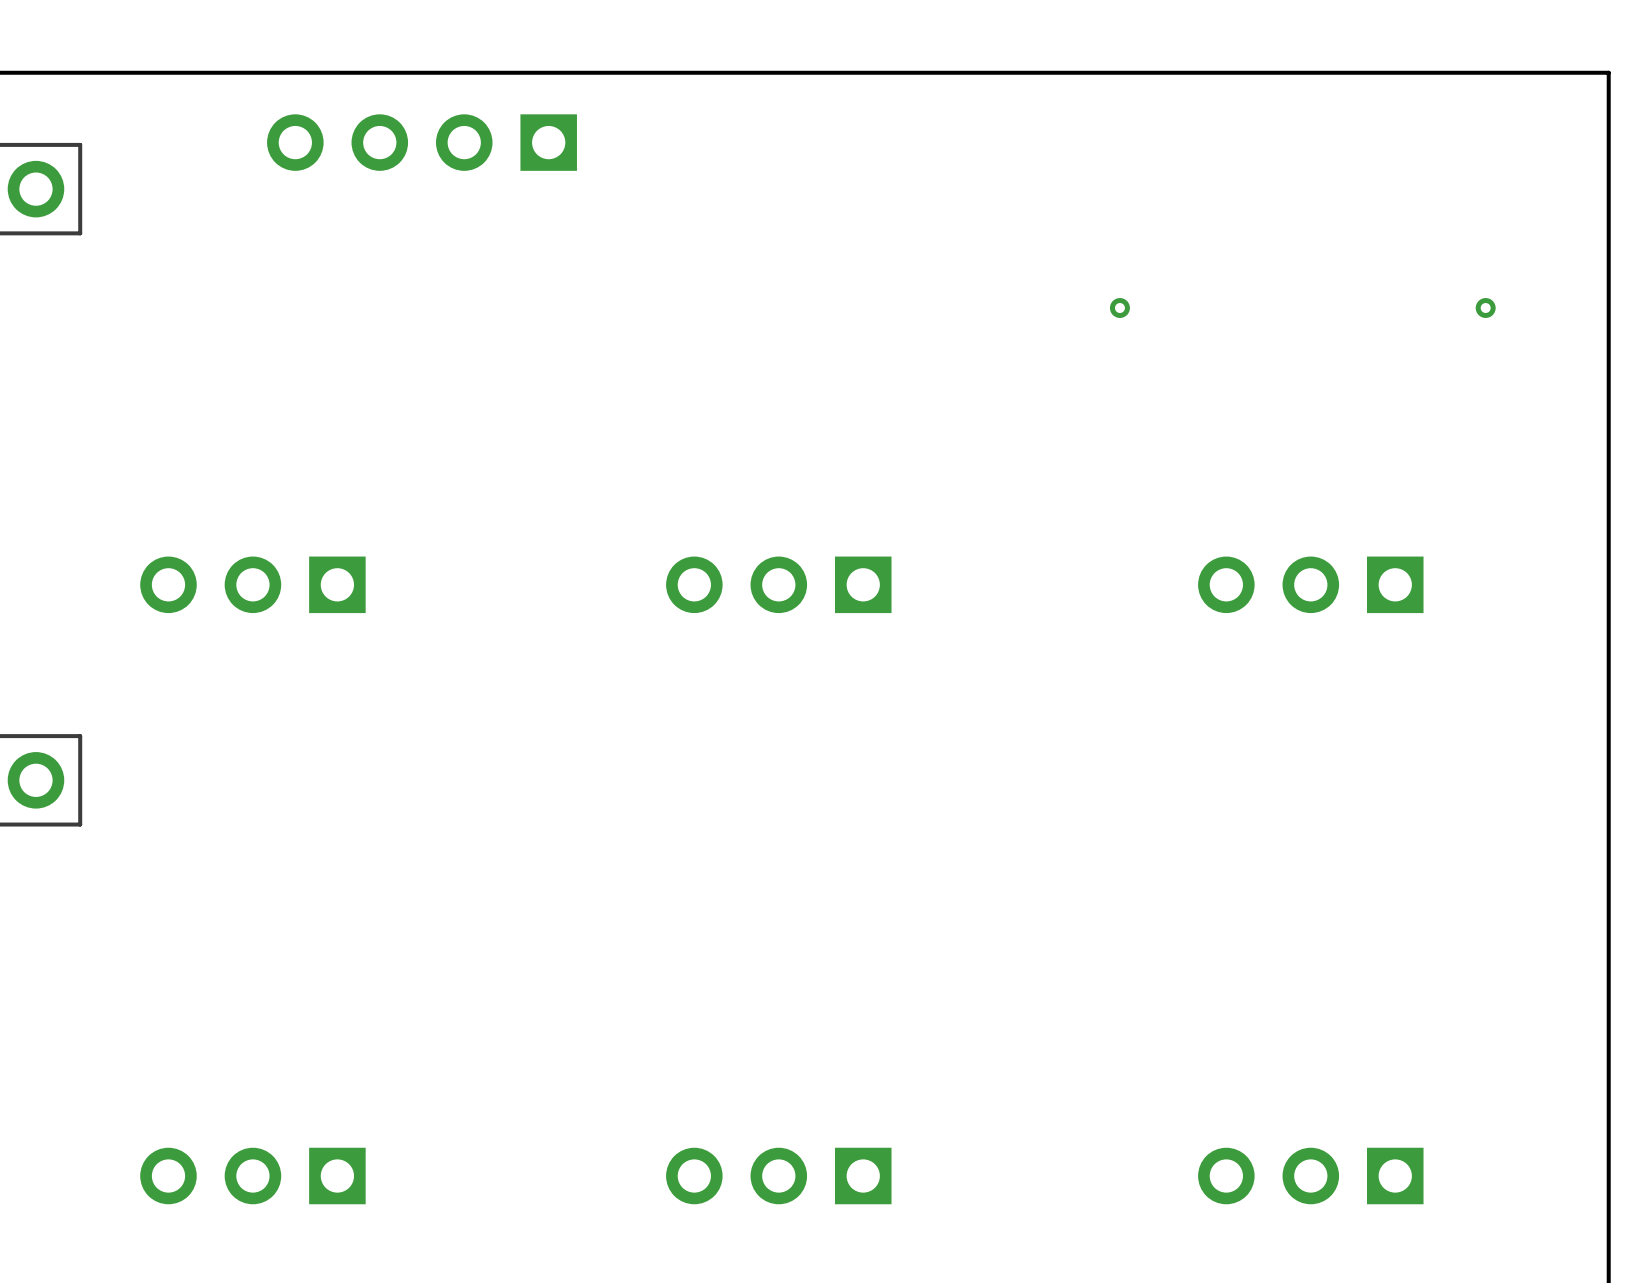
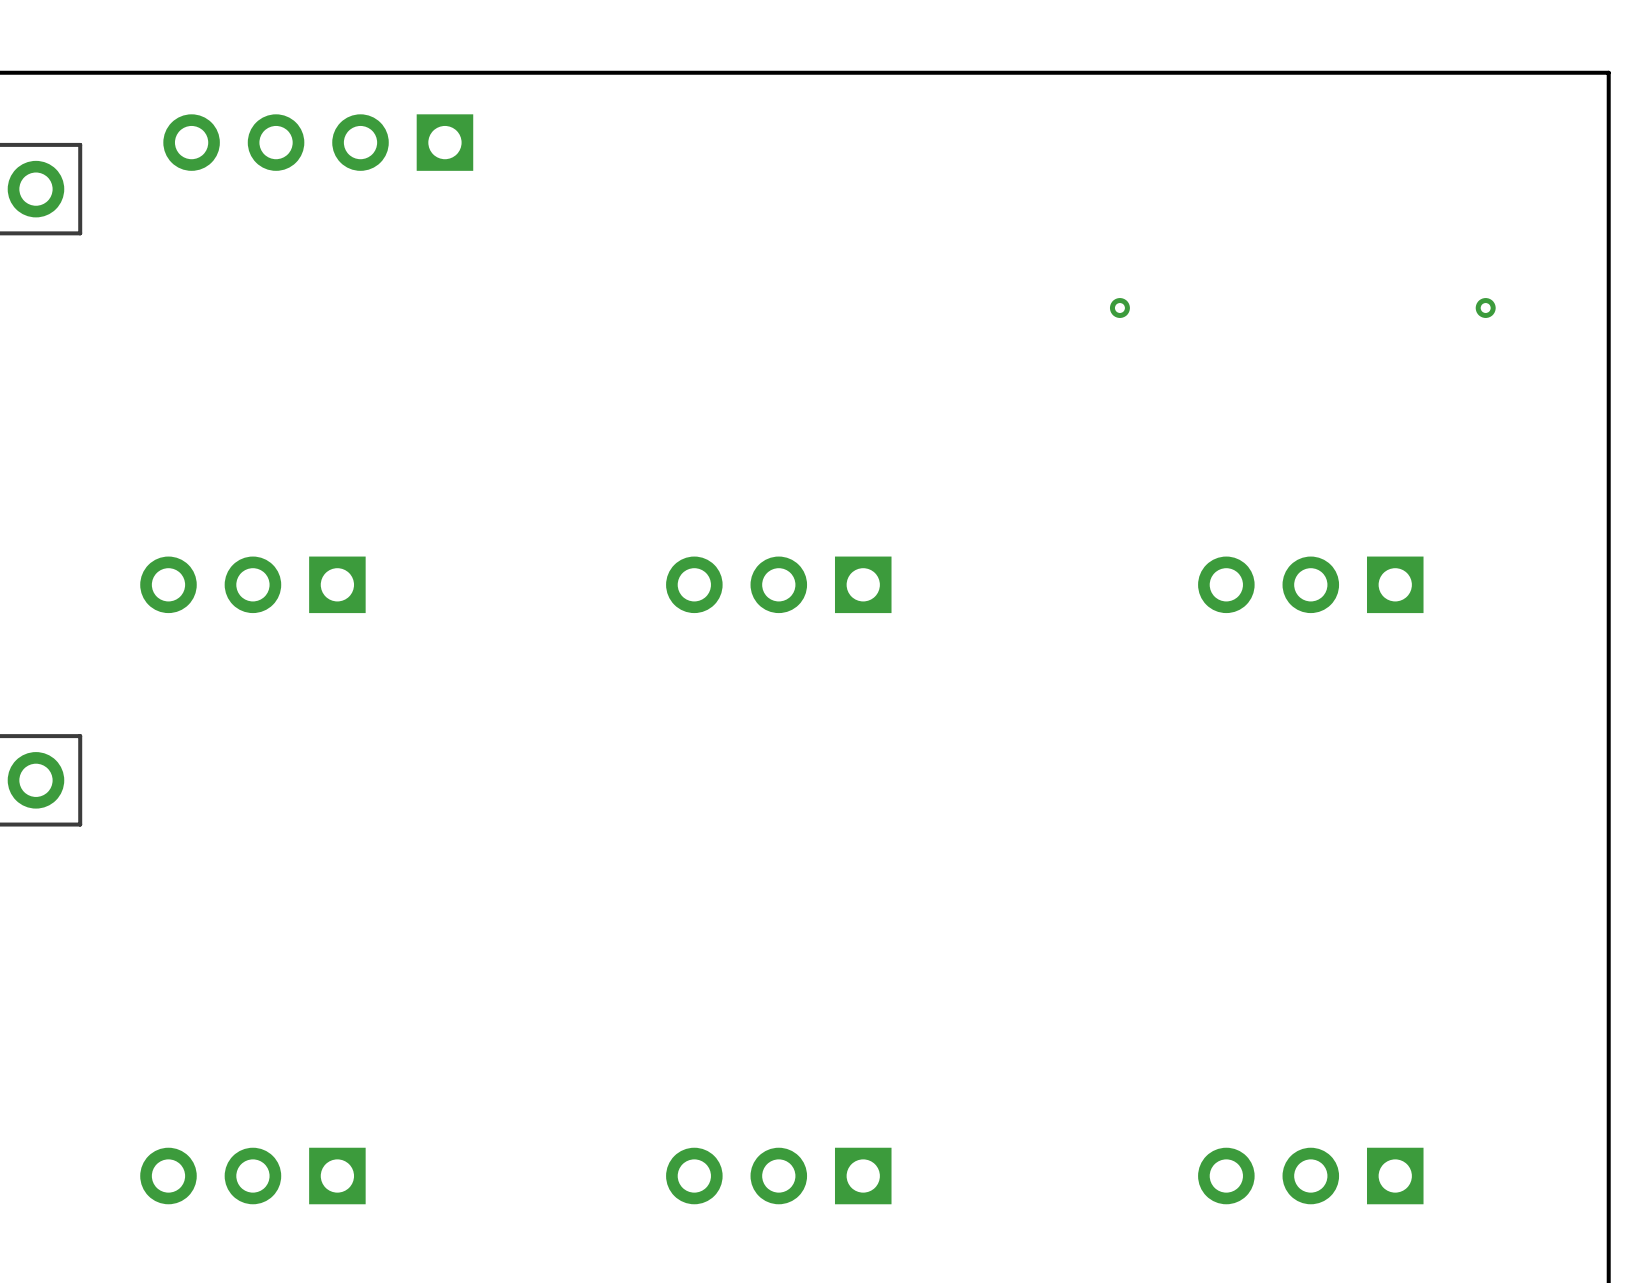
part position: (422, 142) -> (318, 142)

